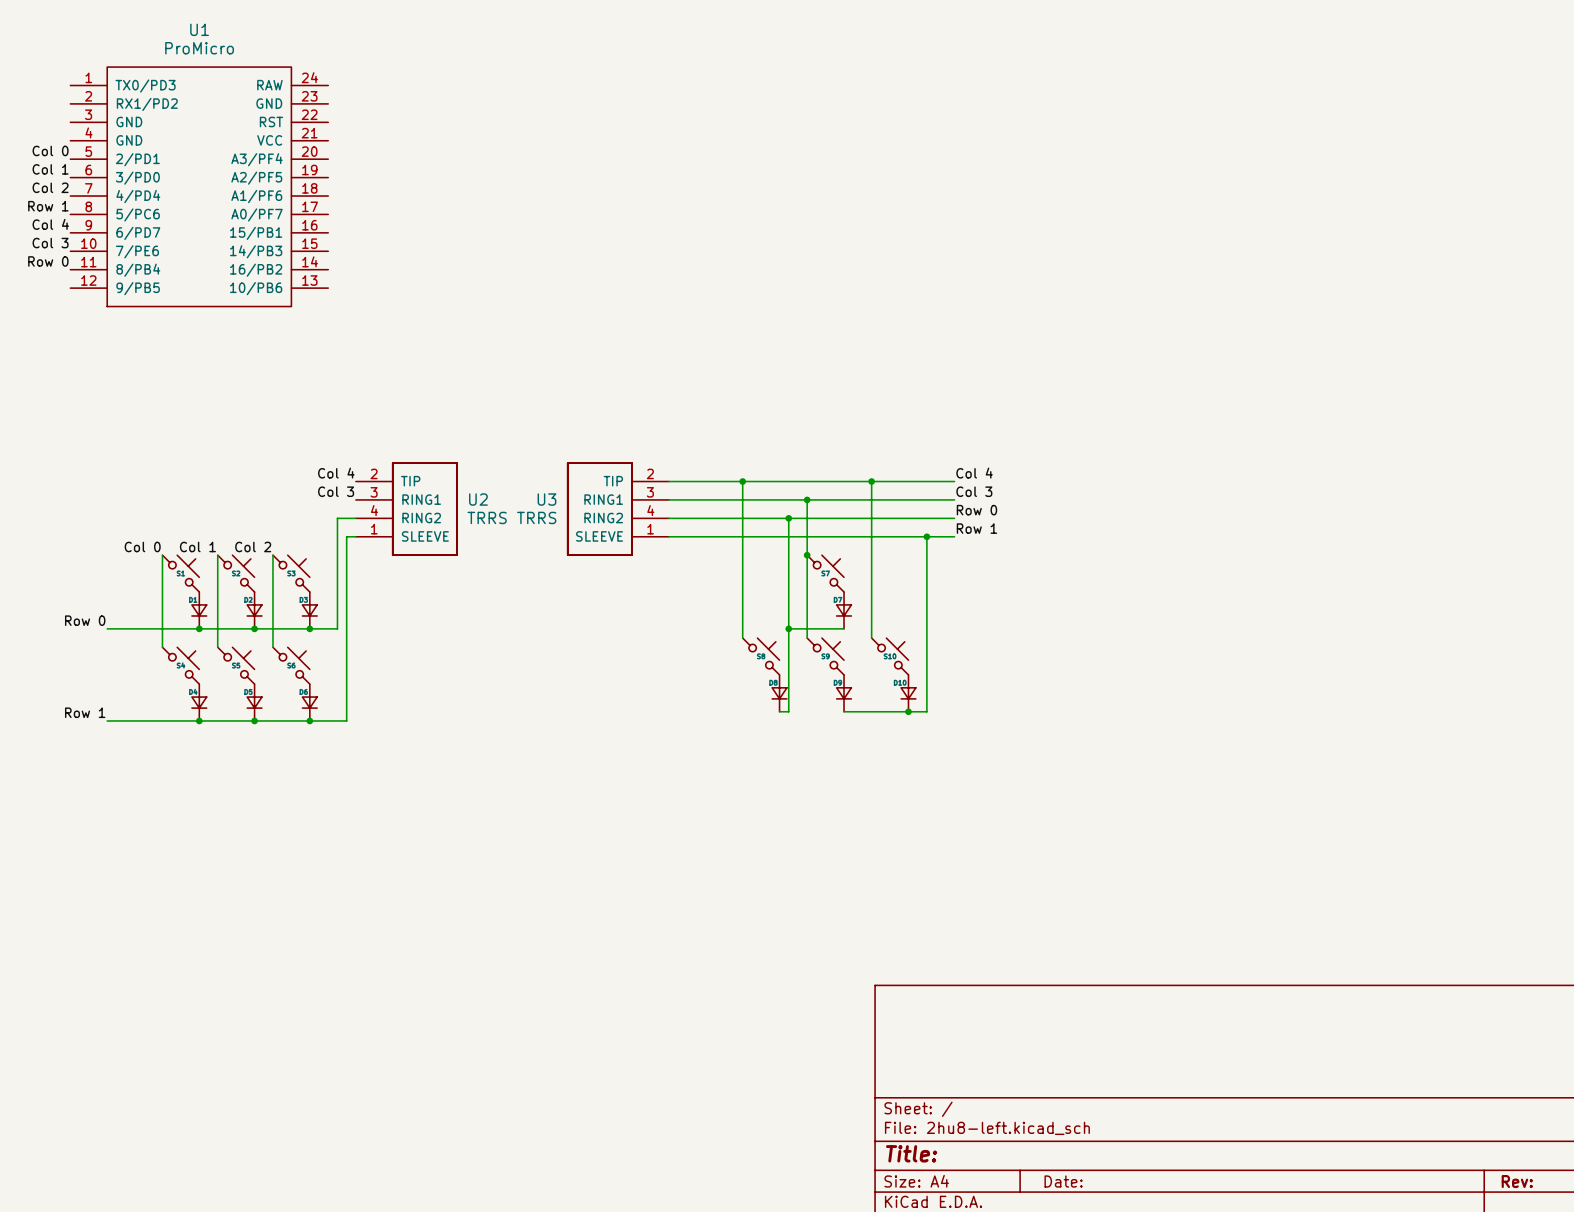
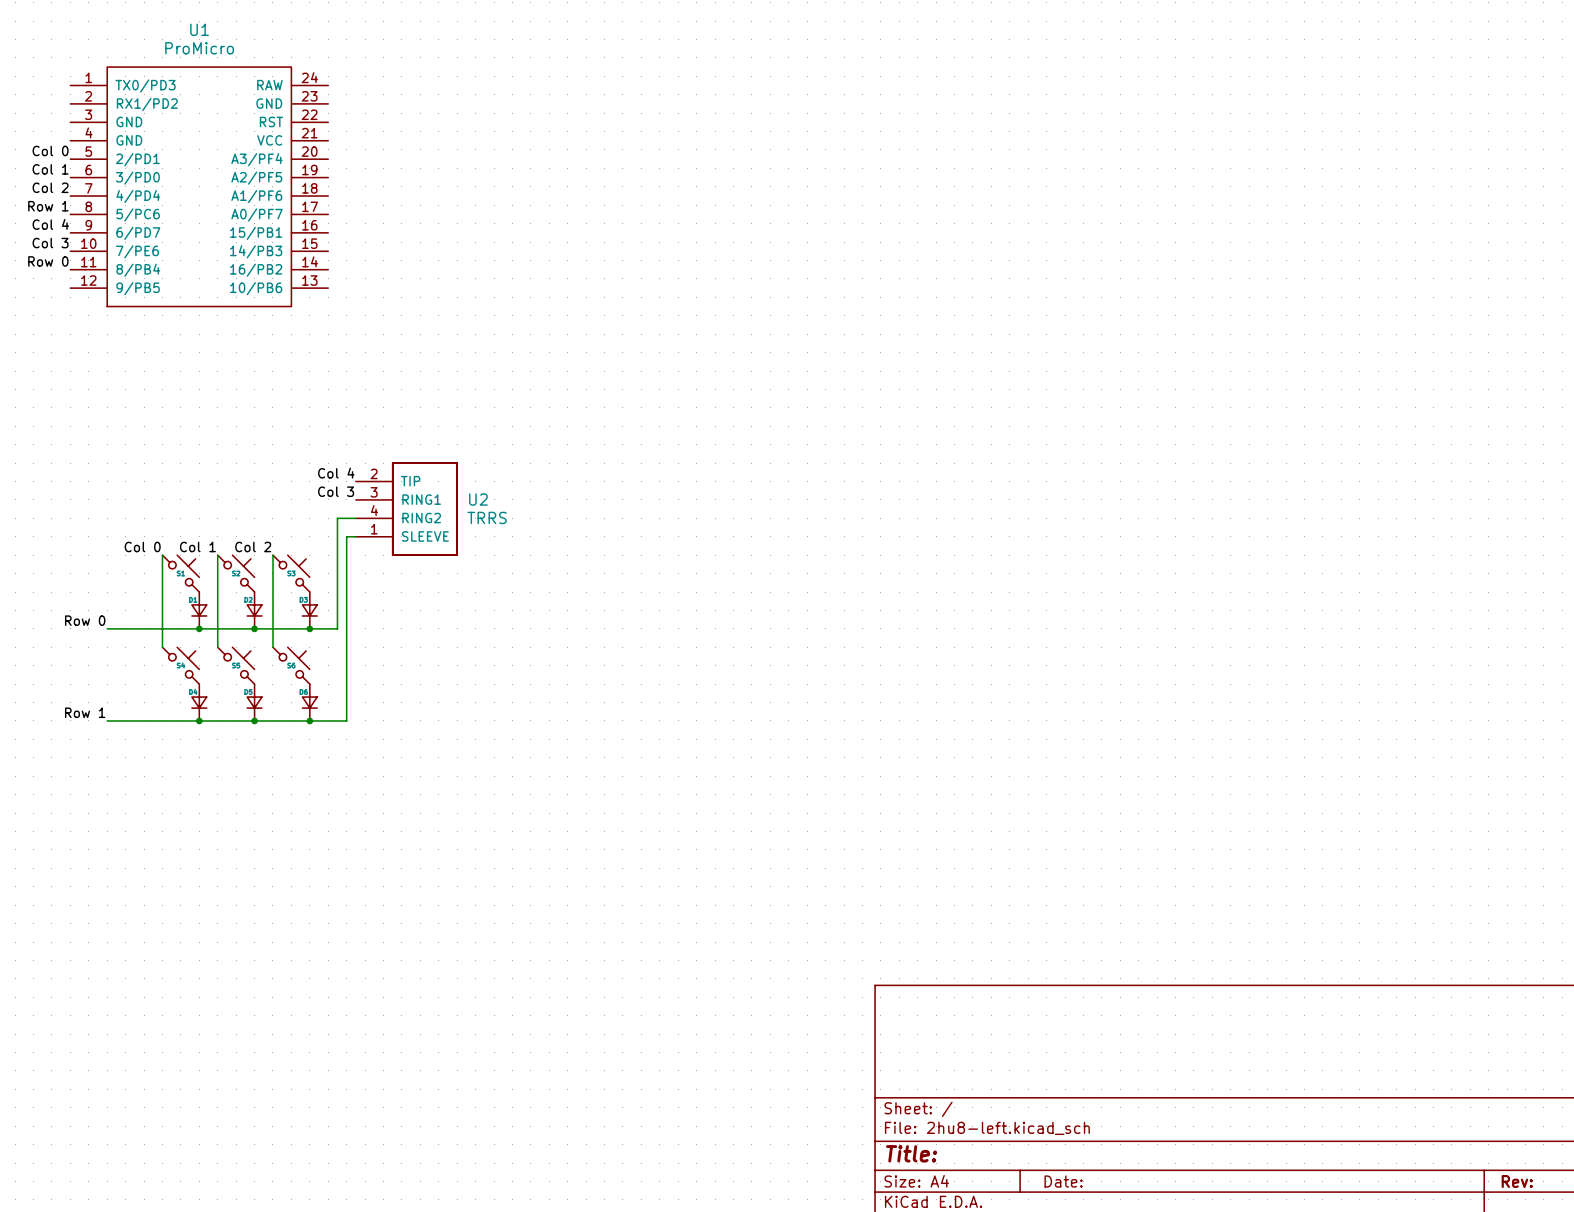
label: Col 4 (974, 473) -> none
wire: (669, 481) (954, 481) -> none
wire: (742, 481) (742, 638) -> none
junction: (742, 481) -> none
wire: (871, 481) (871, 638) -> none
junction: (871, 481) -> none
label: Col 3 (974, 491) -> none
wire: (669, 499) (954, 499) -> none
wire: (807, 499) (807, 638) -> none
junction: (807, 499) -> none
U3: TRRS (618, 509) -> none
label: Row 0 (976, 510) -> none
wire: (669, 518) (954, 518) -> none
wire: (788, 518) (788, 711) (779, 711) -> none
junction: (788, 518) -> none
label: Row 1 (976, 528) -> none
wire: (669, 536) (954, 536) -> none
wire: (926, 536) (926, 711) (844, 711) -> none
junction: (926, 536) -> none
junction: (807, 555) -> none
part: (825, 573) -> none
part: (844, 610) -> none
wire: (788, 628) (844, 628) -> none
junction: (788, 628) -> none
part: (761, 656) -> none
part: (825, 656) -> none
part: (890, 656) -> none
part: (779, 693) -> none
part: (844, 693) -> none
part: (908, 693) -> none
junction: (908, 711) -> none

